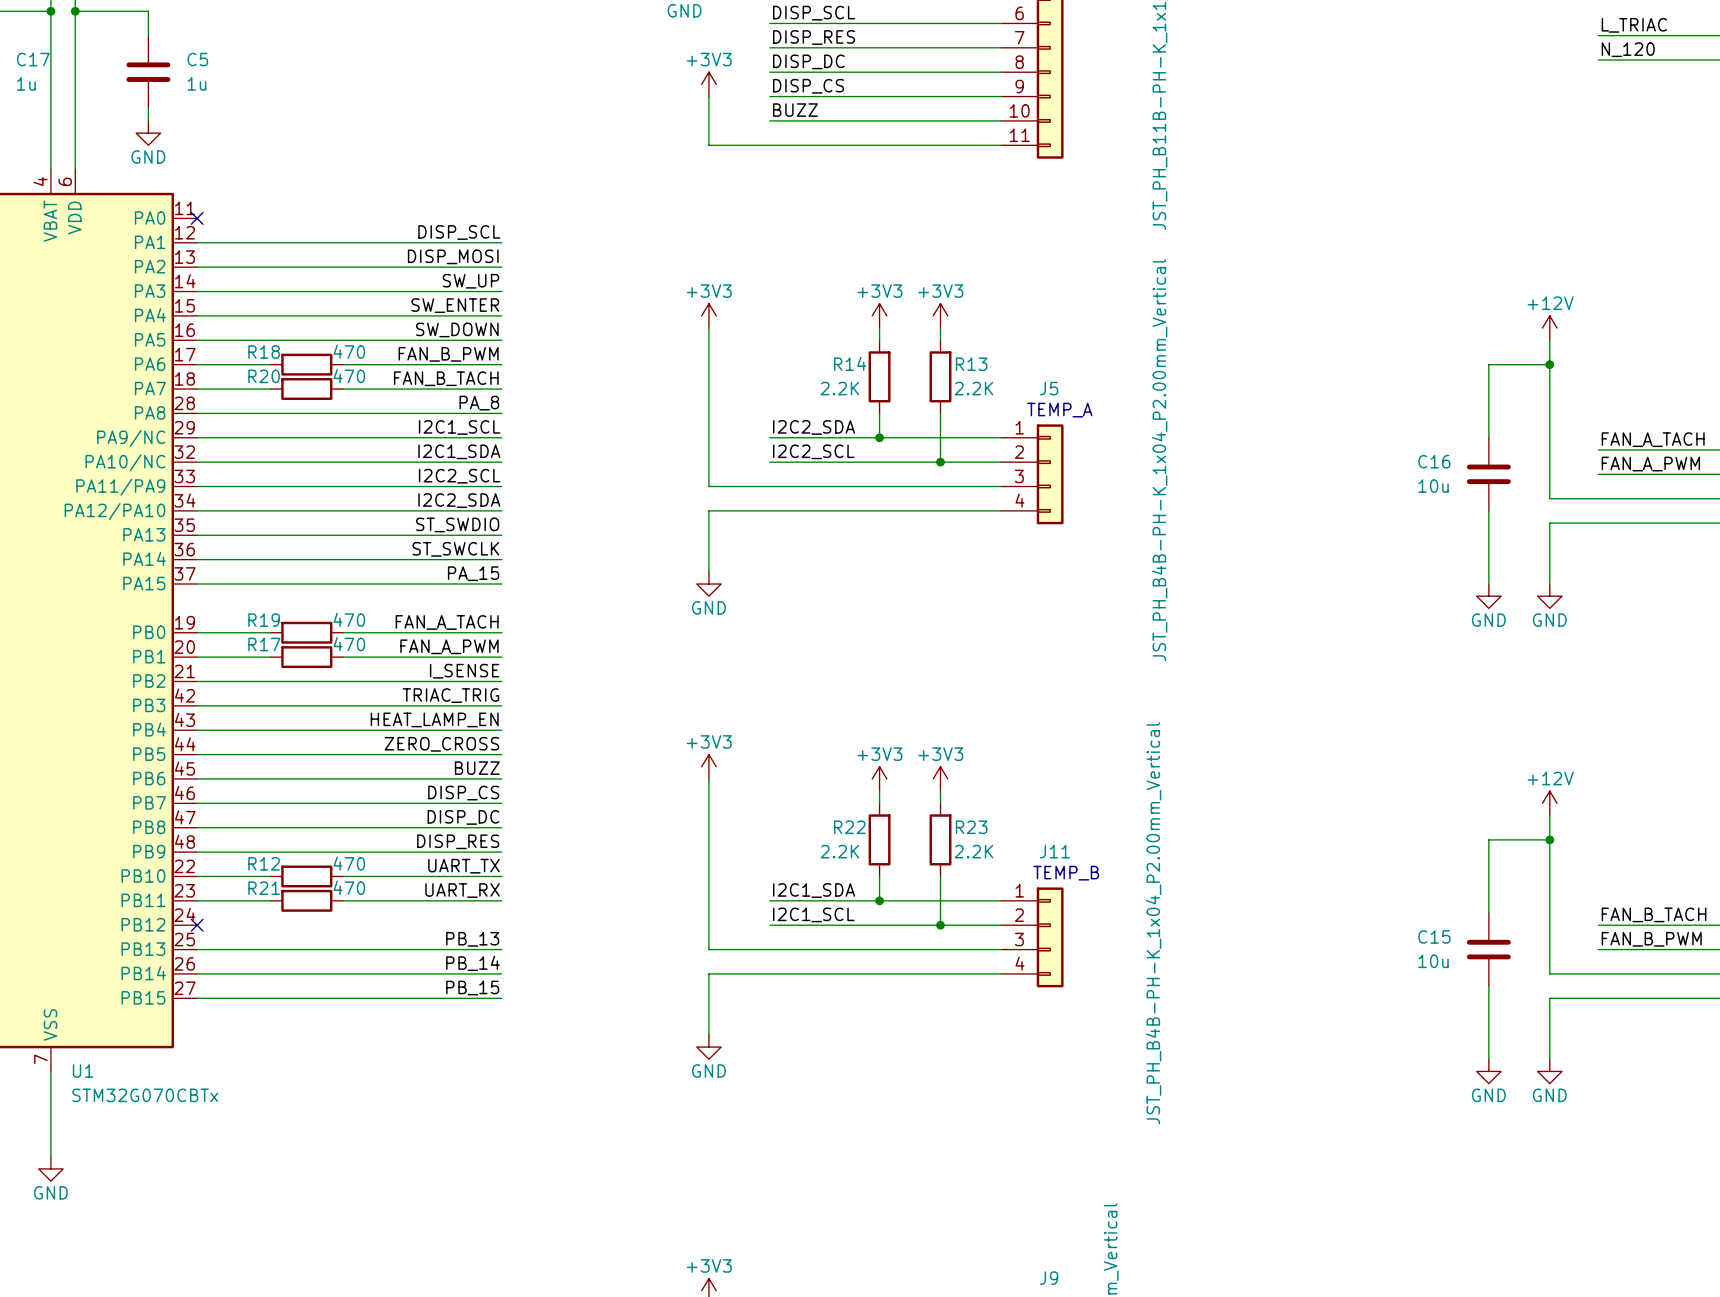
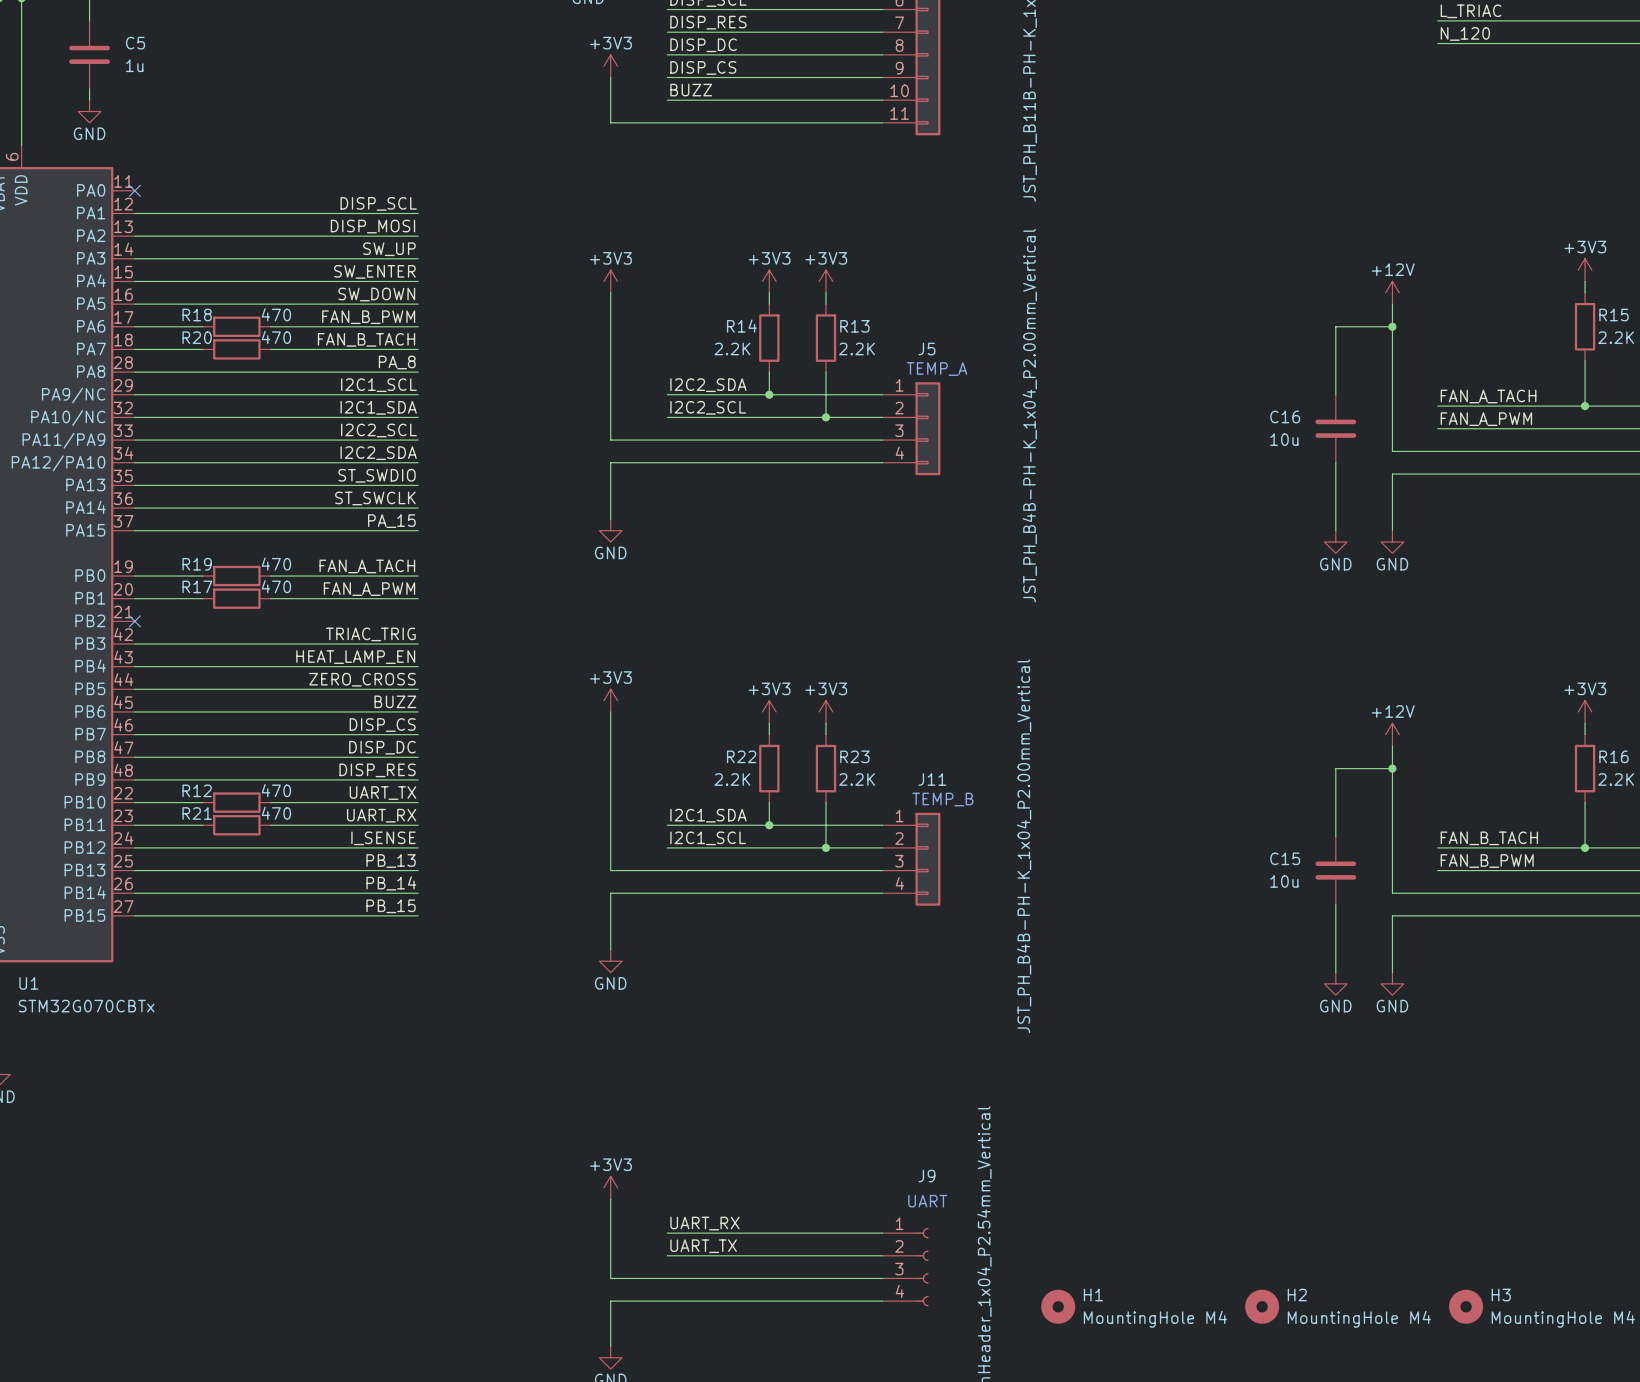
label: I_SENSE (464, 671) -> none
wire: (197, 681) (501, 681) -> none
no-connect mark: none -> (134, 621)
label: none -> I_SENSE (383, 838)
wire: none -> (134, 847) (418, 847)
no-connect mark: (197, 925) -> none

